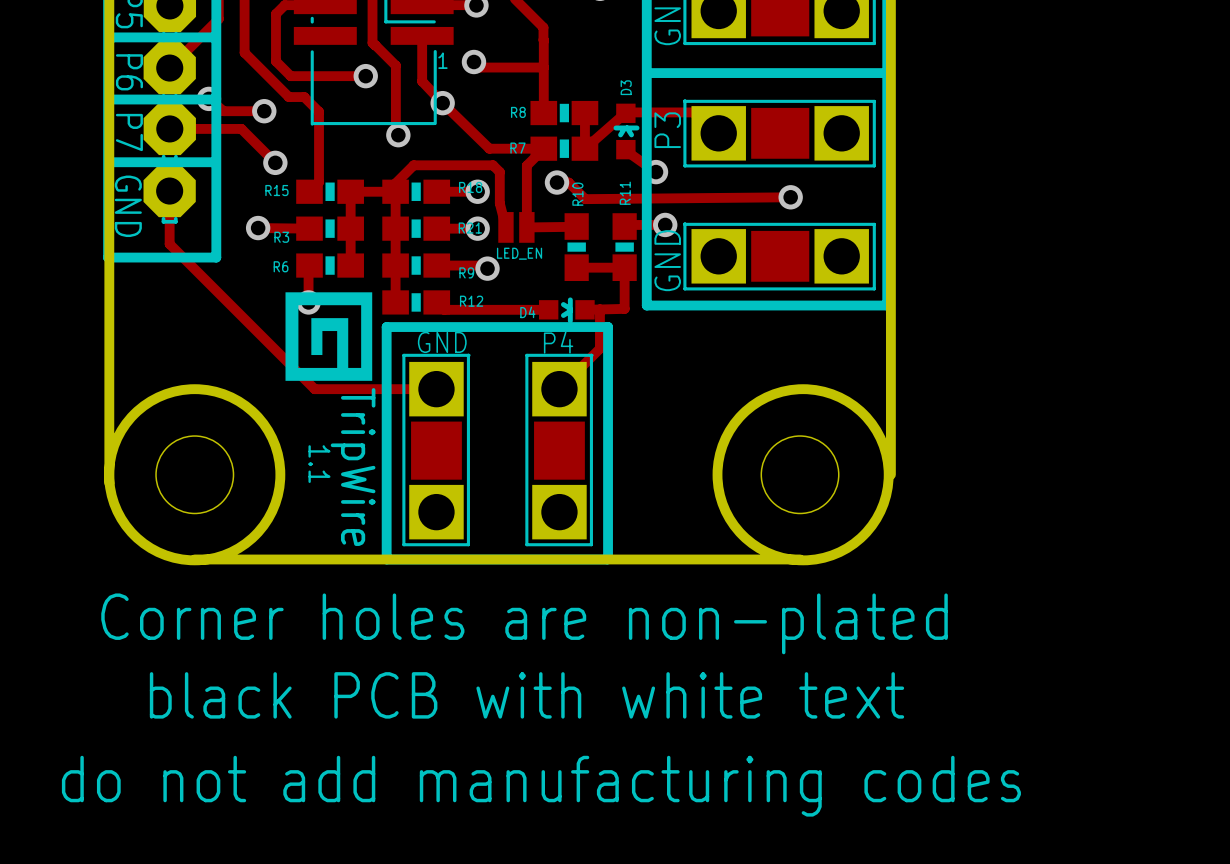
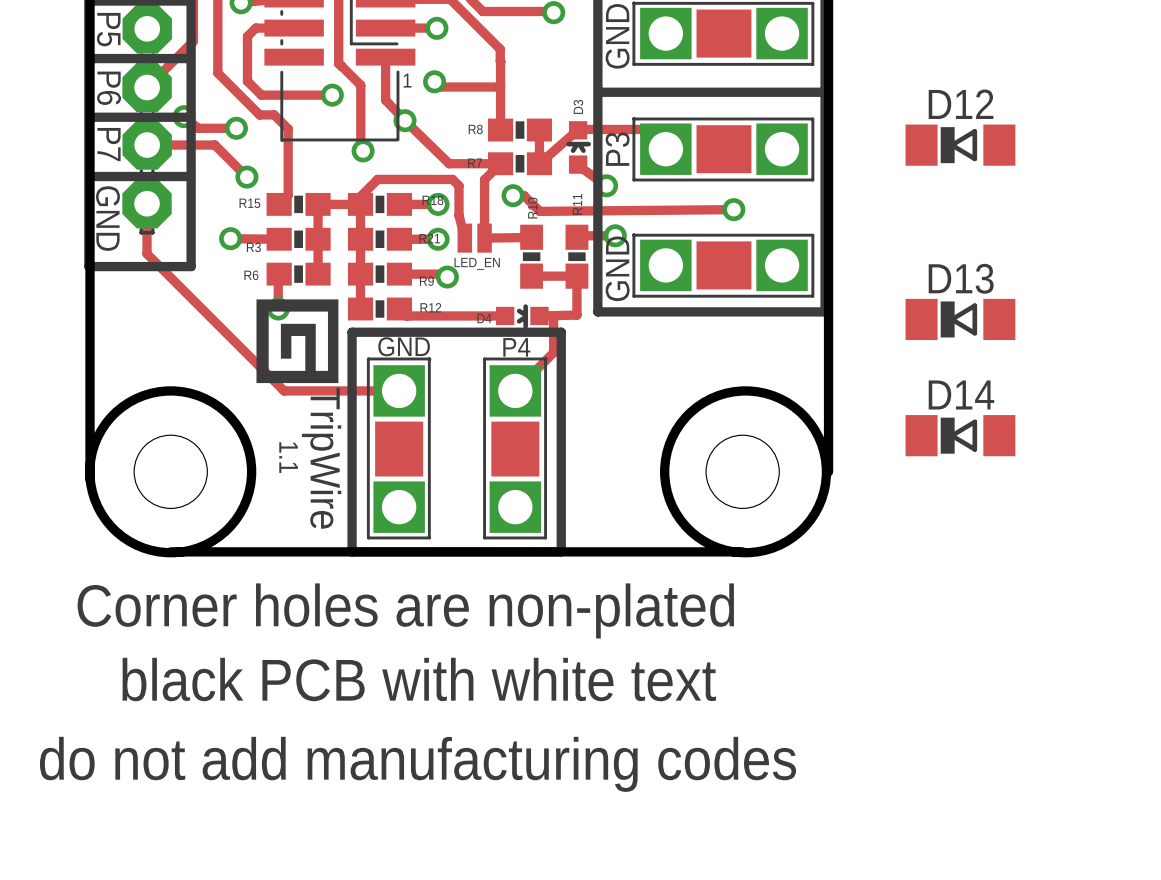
D12: none -> (960, 145)
D13: none -> (960, 319)
D14: none -> (960, 435)

